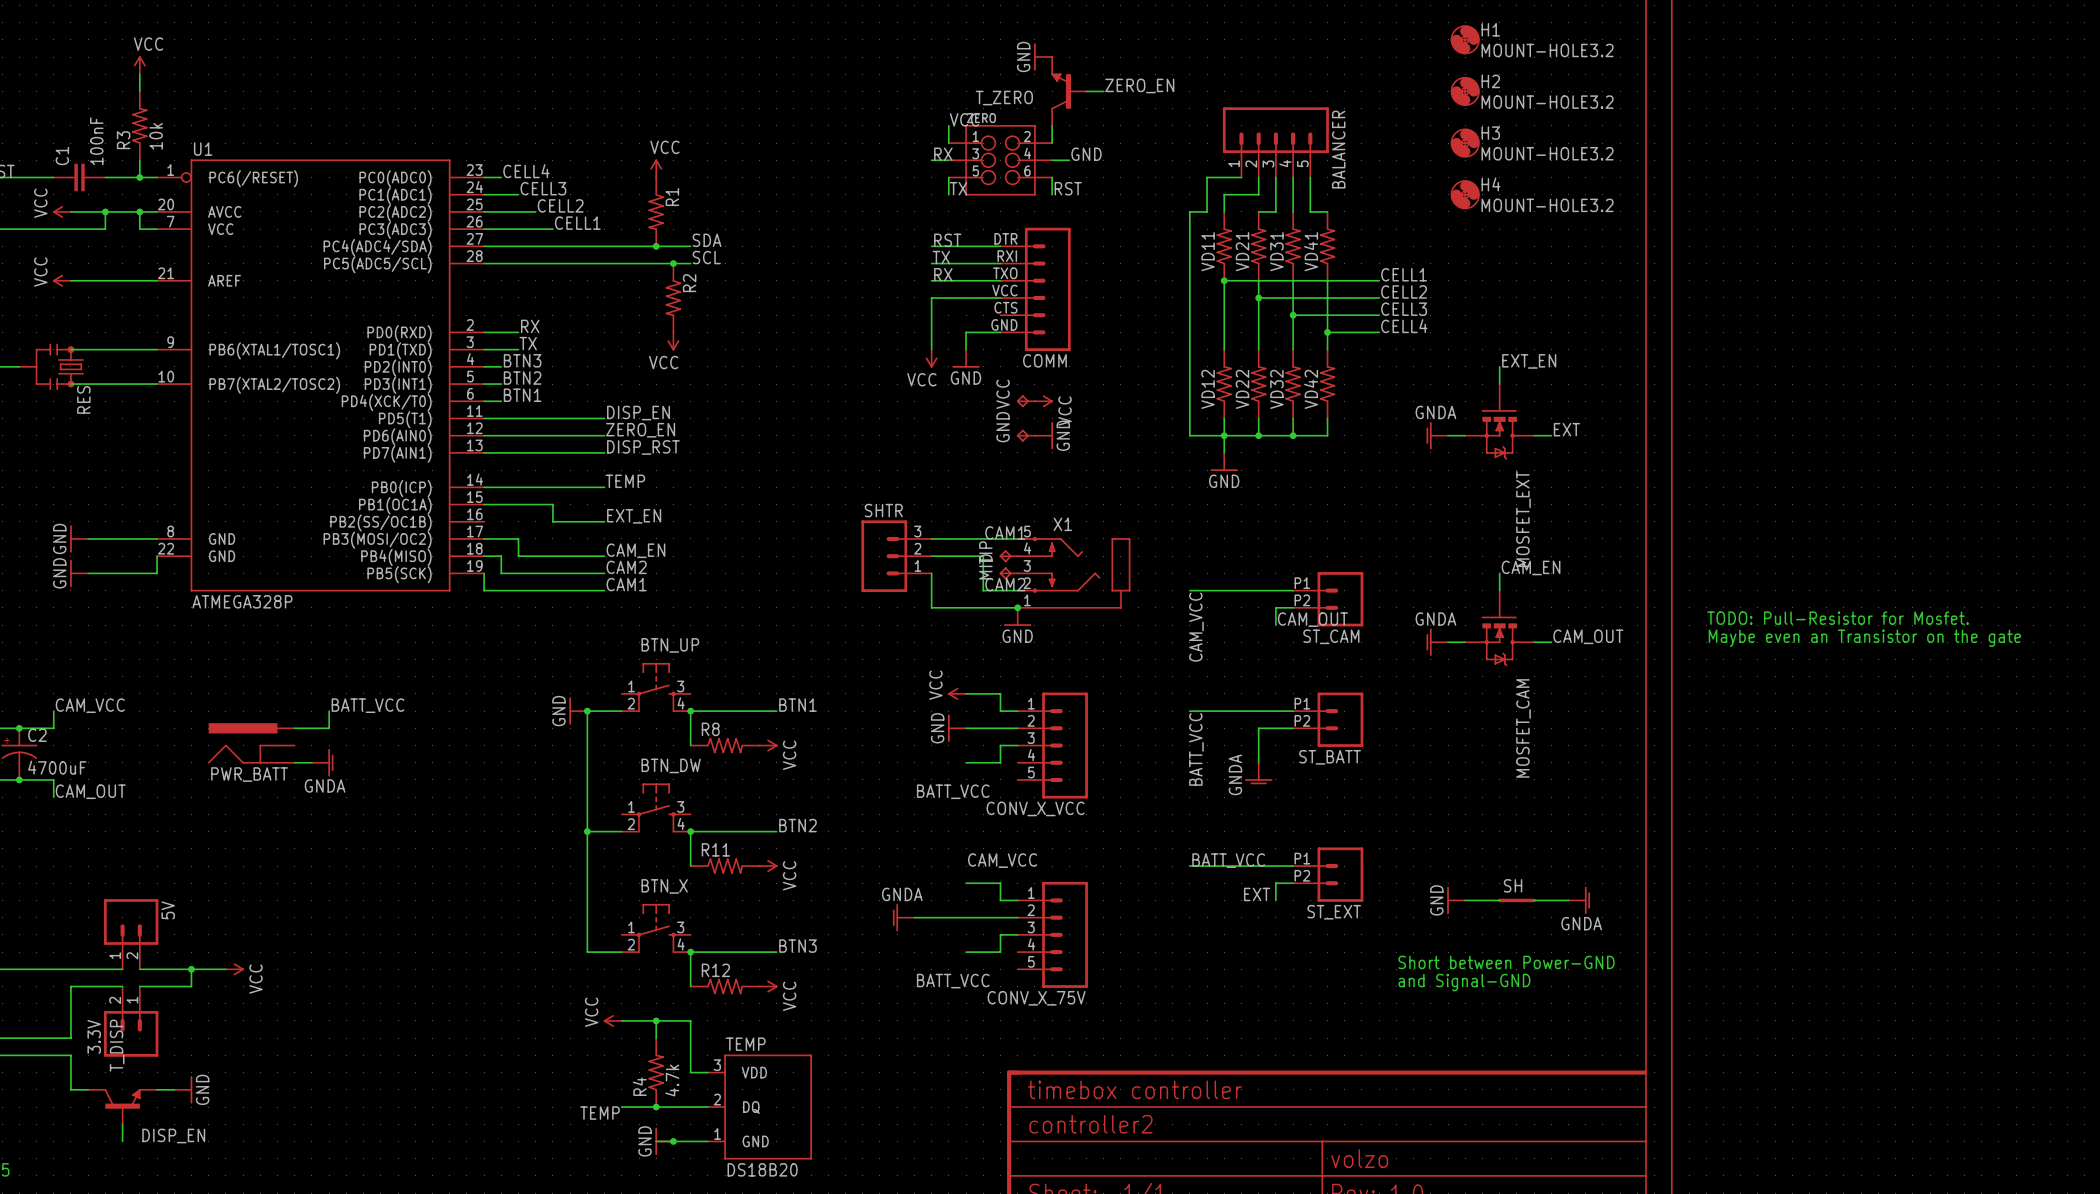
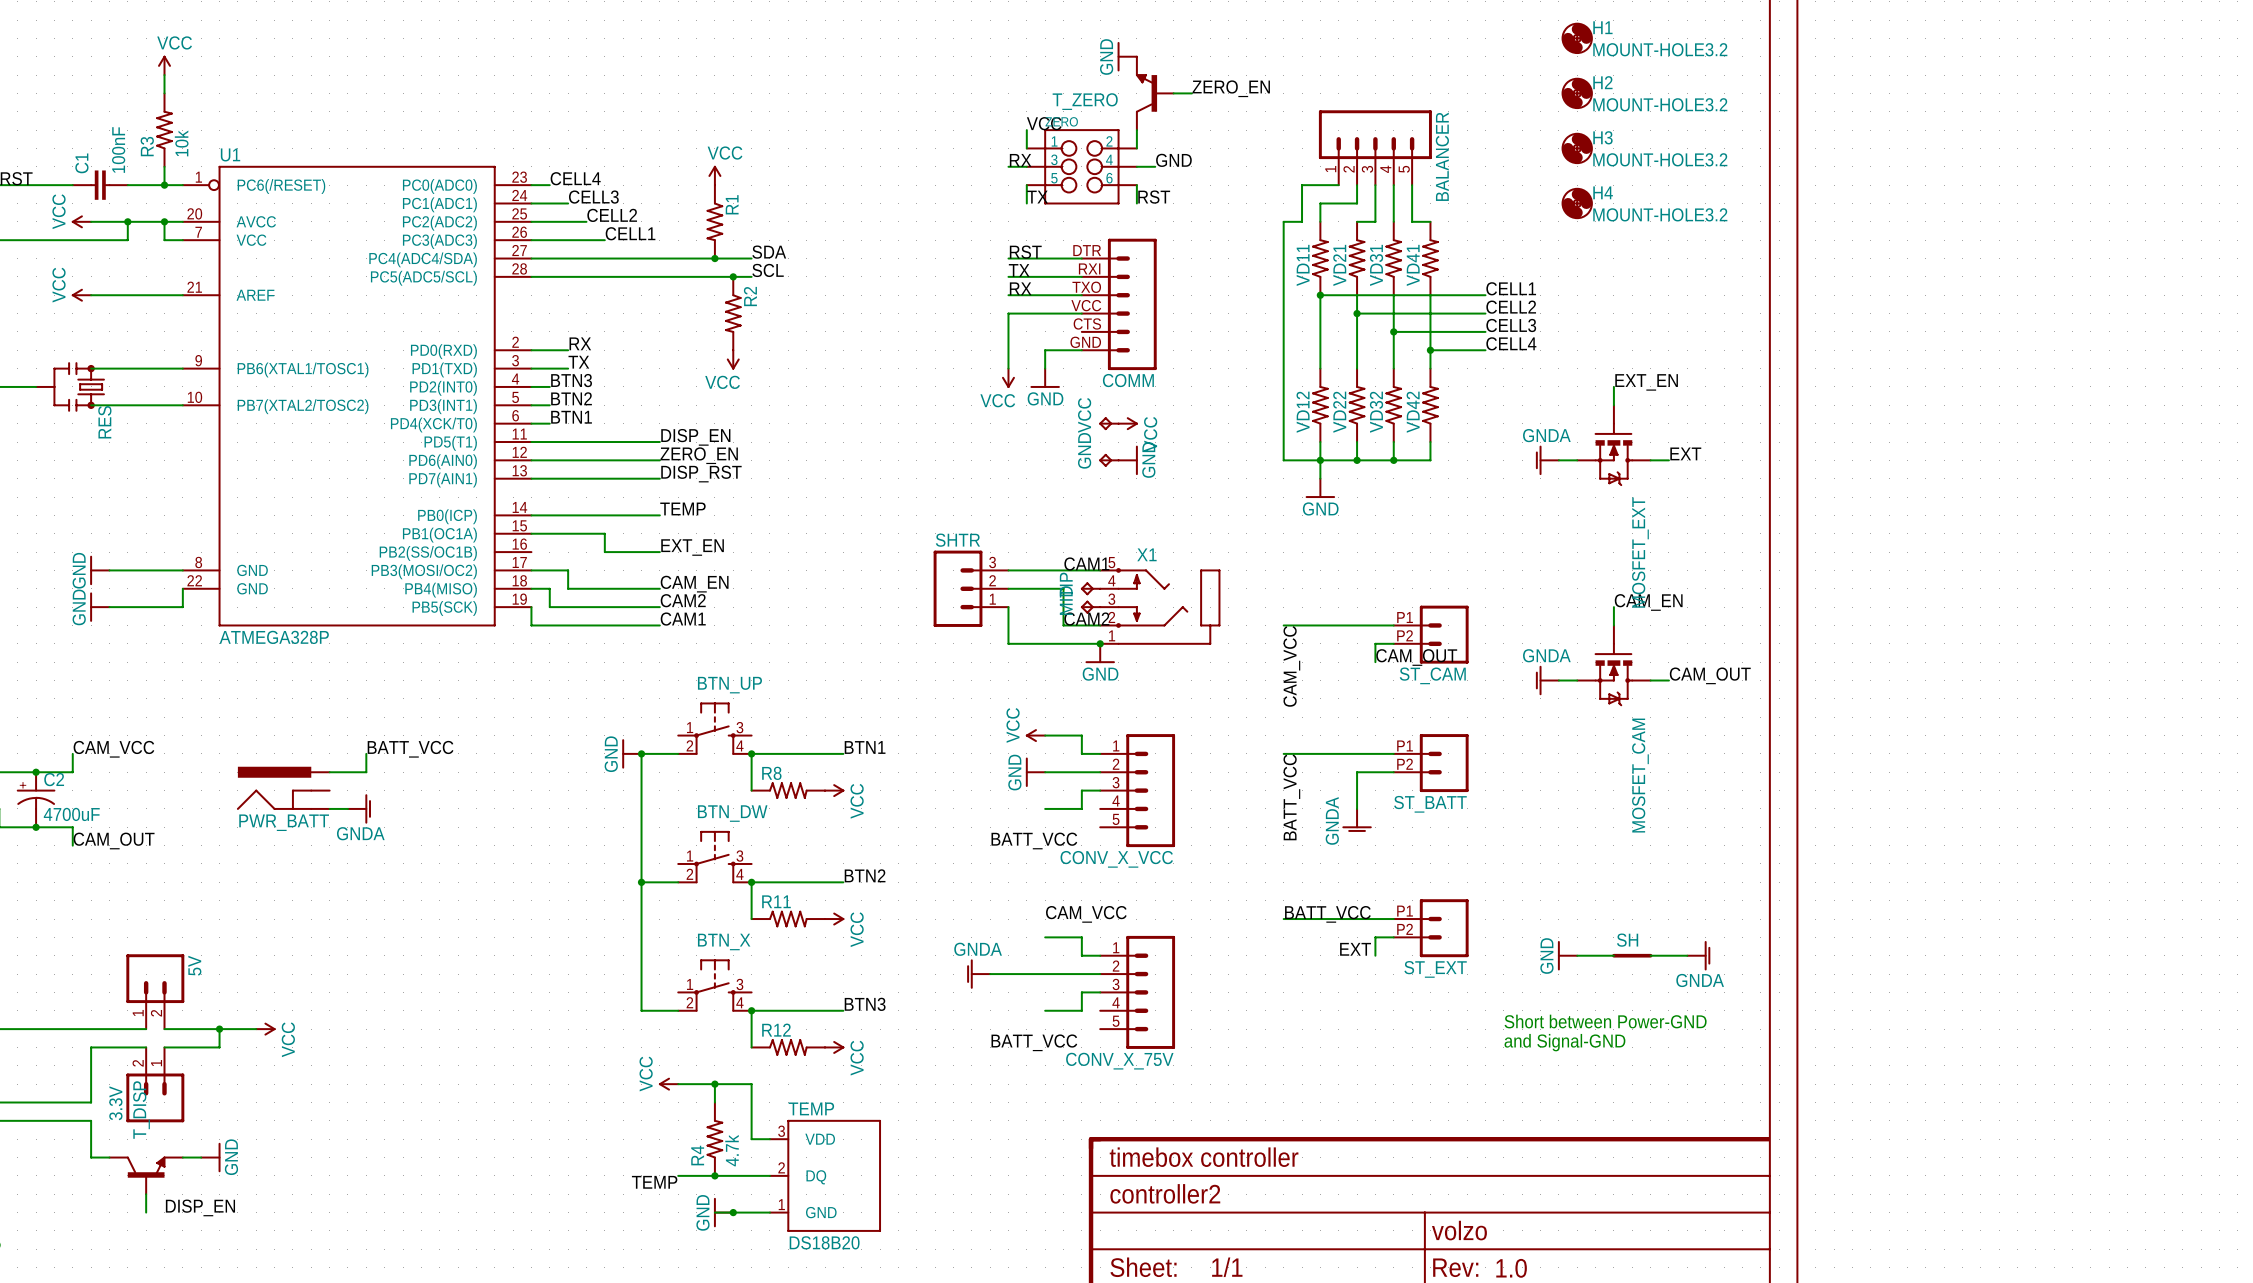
text: TODO: Pull-Resistor for Mosfet. (1838, 618) -> none
text: Maybe even an Transistor on the gate (1864, 638) -> none

